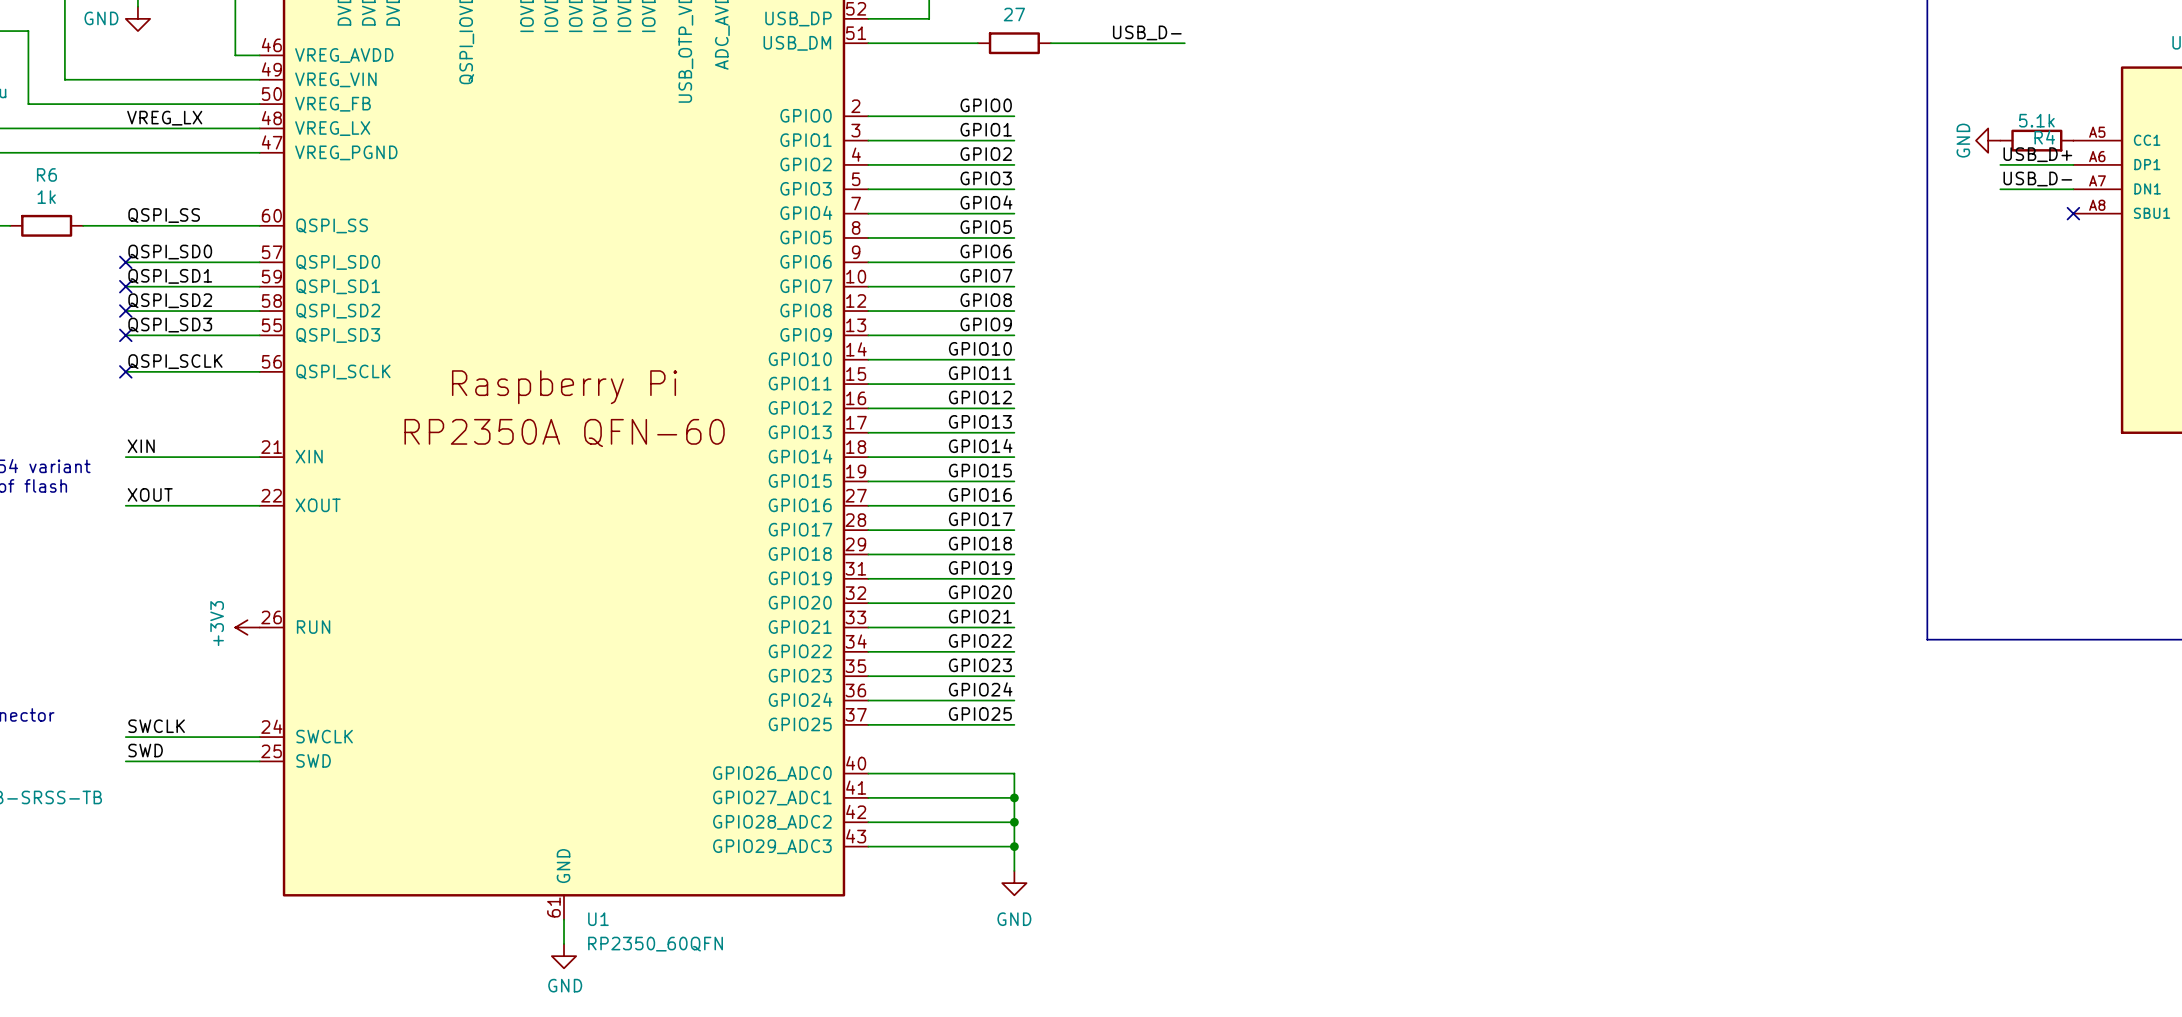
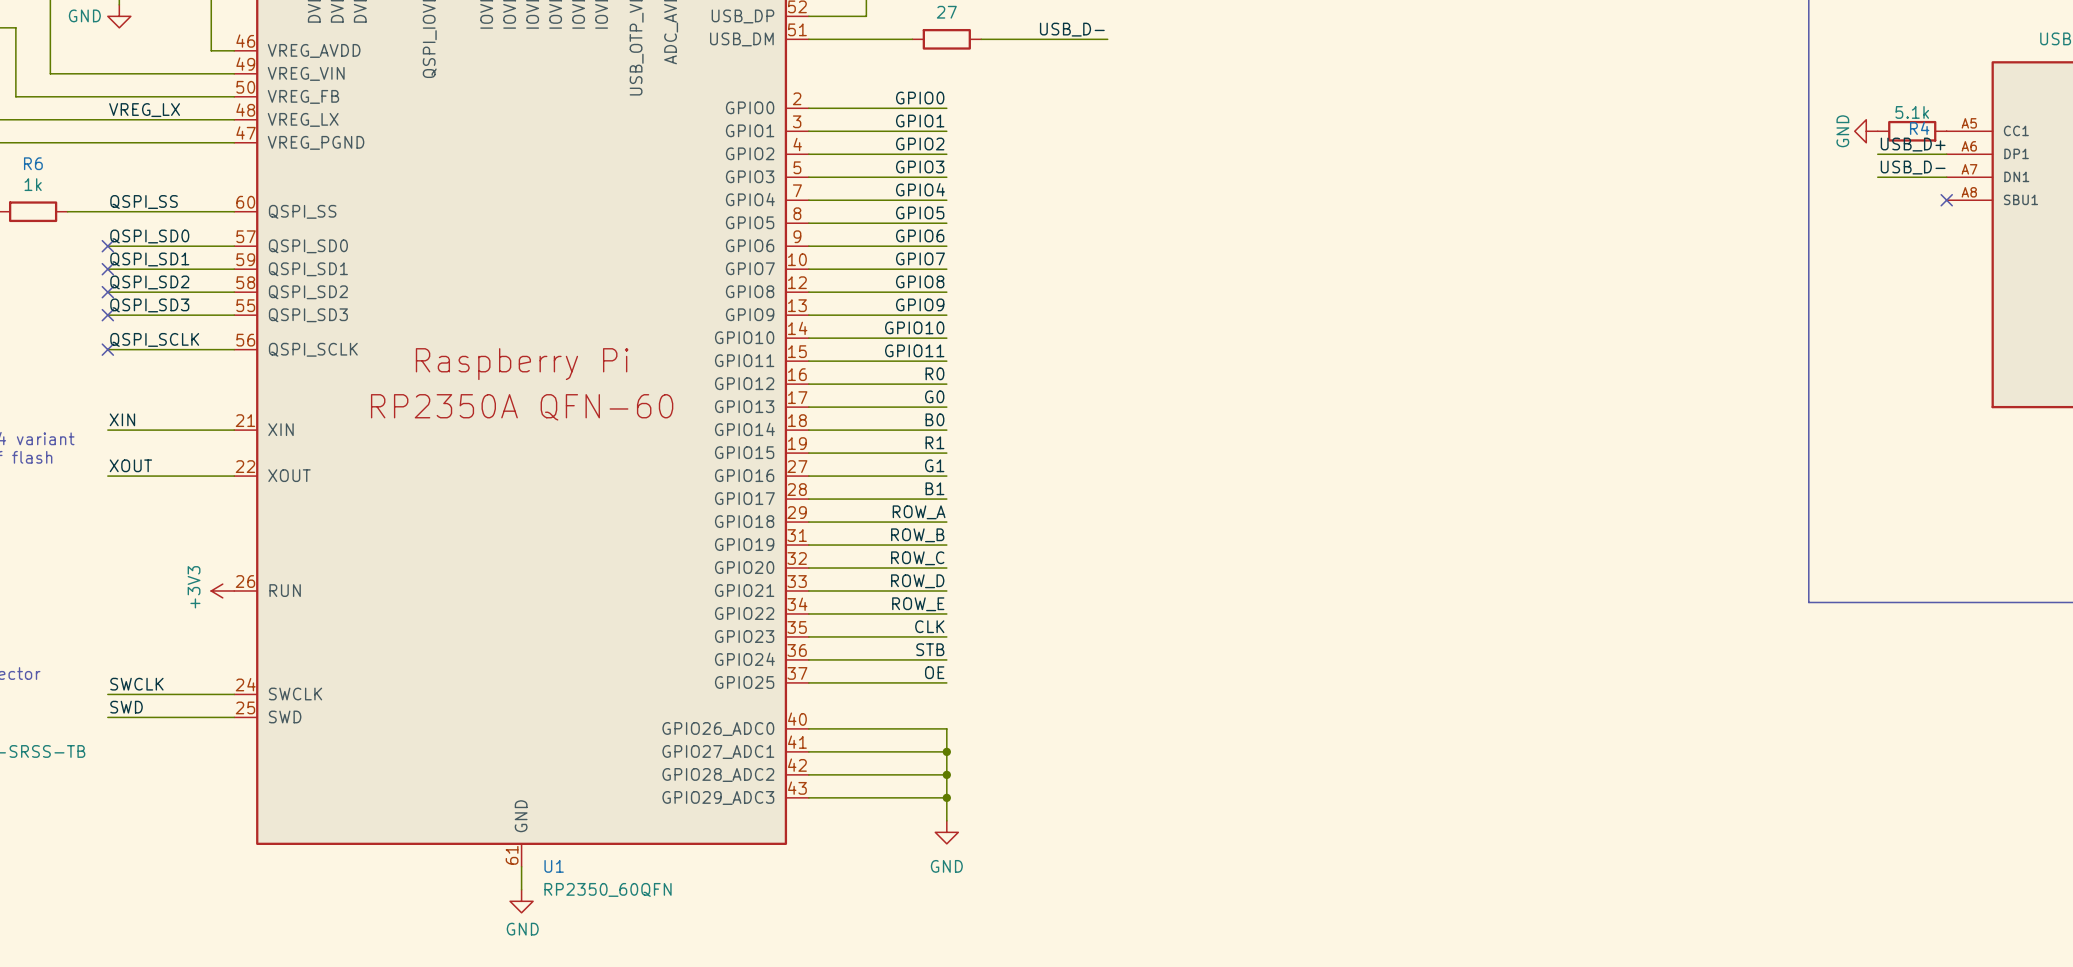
label: GPIO12 (980, 397) -> R0 (934, 373)
label: GPIO13 (980, 421) -> G0 (934, 396)
label: GPIO14 (980, 445) -> B0 (934, 419)
label: GPIO15 (980, 470) -> R1 (934, 442)
label: GPIO16 (980, 494) -> G1 (934, 465)
label: GPIO17 (980, 519) -> B1 (934, 488)
label: GPIO18 (980, 543) -> ROW_A (919, 512)
label: GPIO19 (980, 567) -> ROW_B (917, 535)
label: GPIO20 (980, 592) -> ROW_C (917, 558)
label: GPIO21 (980, 616) -> ROW_D (917, 581)
label: GPIO22 (980, 640) -> ROW_E (918, 604)
label: GPIO23 (980, 665) -> CLK (929, 626)
label: GPIO24 (980, 689) -> STB (930, 649)
label: GPIO25 (980, 714) -> OE (934, 672)

